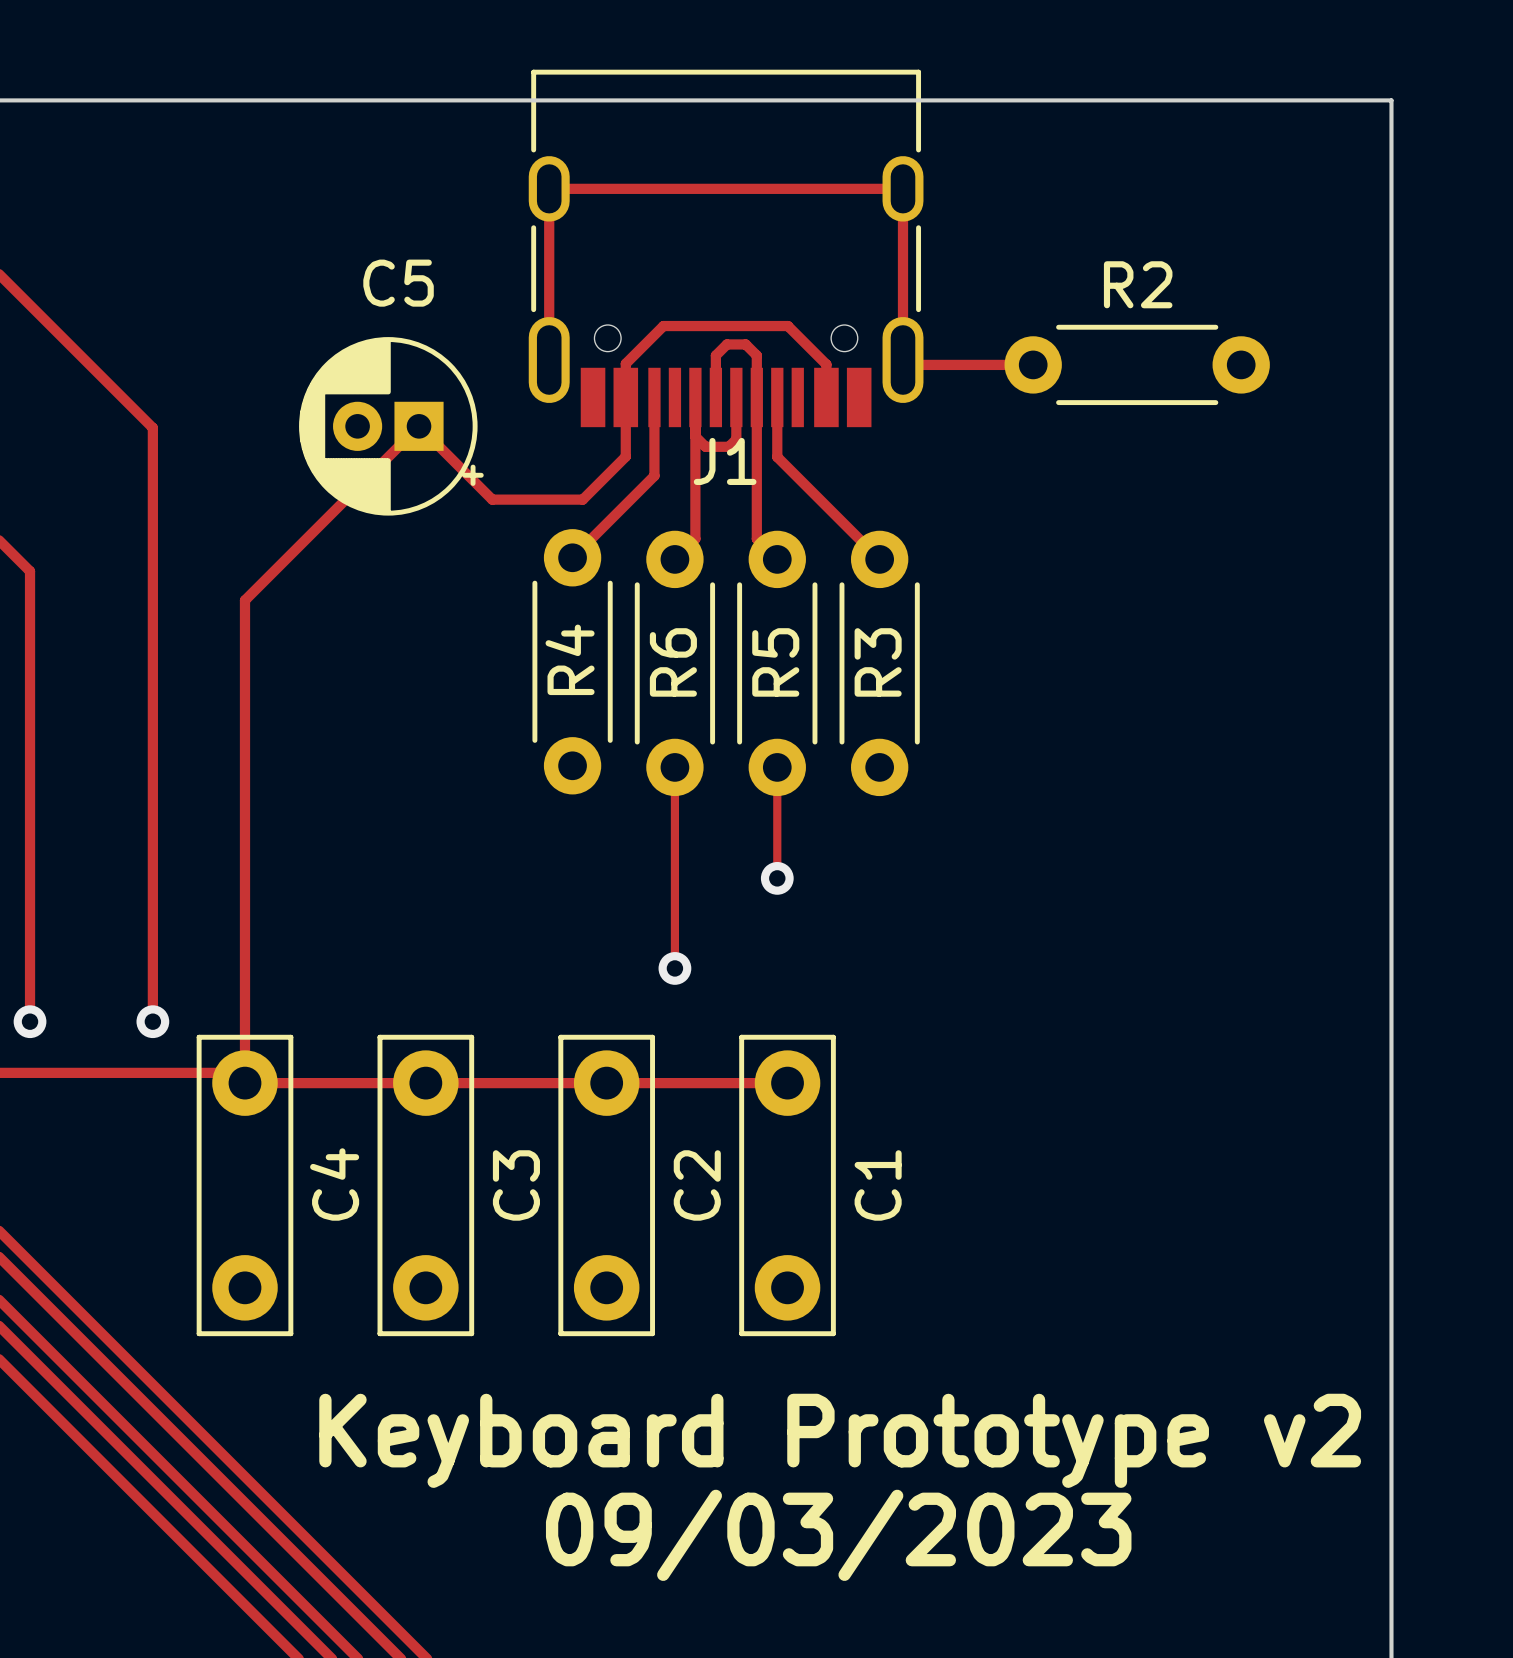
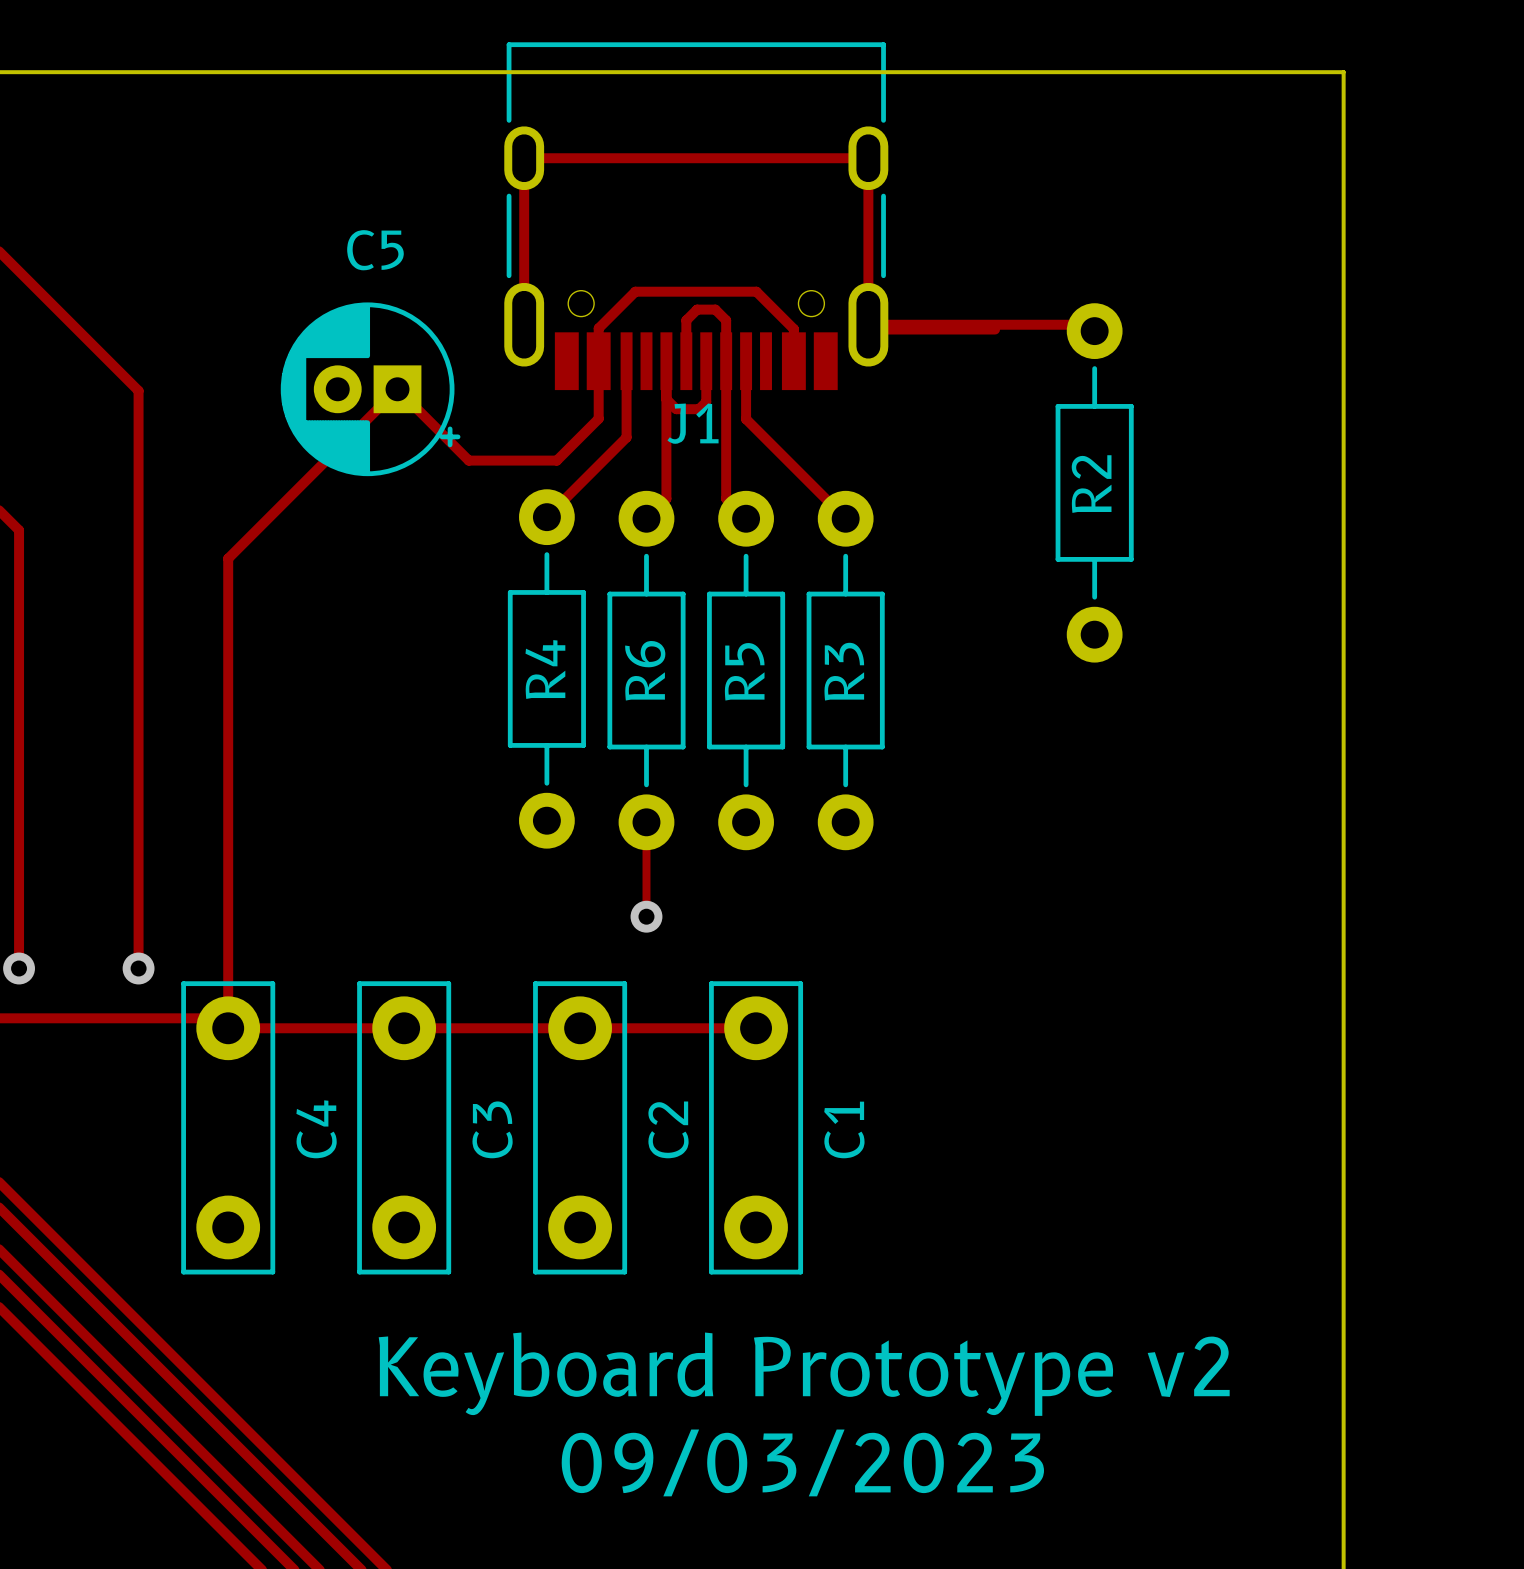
R2 footprint: [1004, 324, 1270, 406] -> [1055, 303, 1134, 663]
track: none -> (868, 324) (1088, 324) (1094, 331)
R4 footprint: [532, 529, 613, 795] -> [507, 489, 586, 849]
R6 footprint: [634, 530, 716, 797] -> [607, 490, 686, 851]
R5 footprint: [737, 530, 818, 797] -> [707, 490, 786, 851]
R3 footprint: [839, 530, 920, 797] -> [806, 490, 885, 851]
track: (674, 767) (674, 871) -> none
track: (777, 767) (777, 878) -> none
via: (777, 878) -> none

